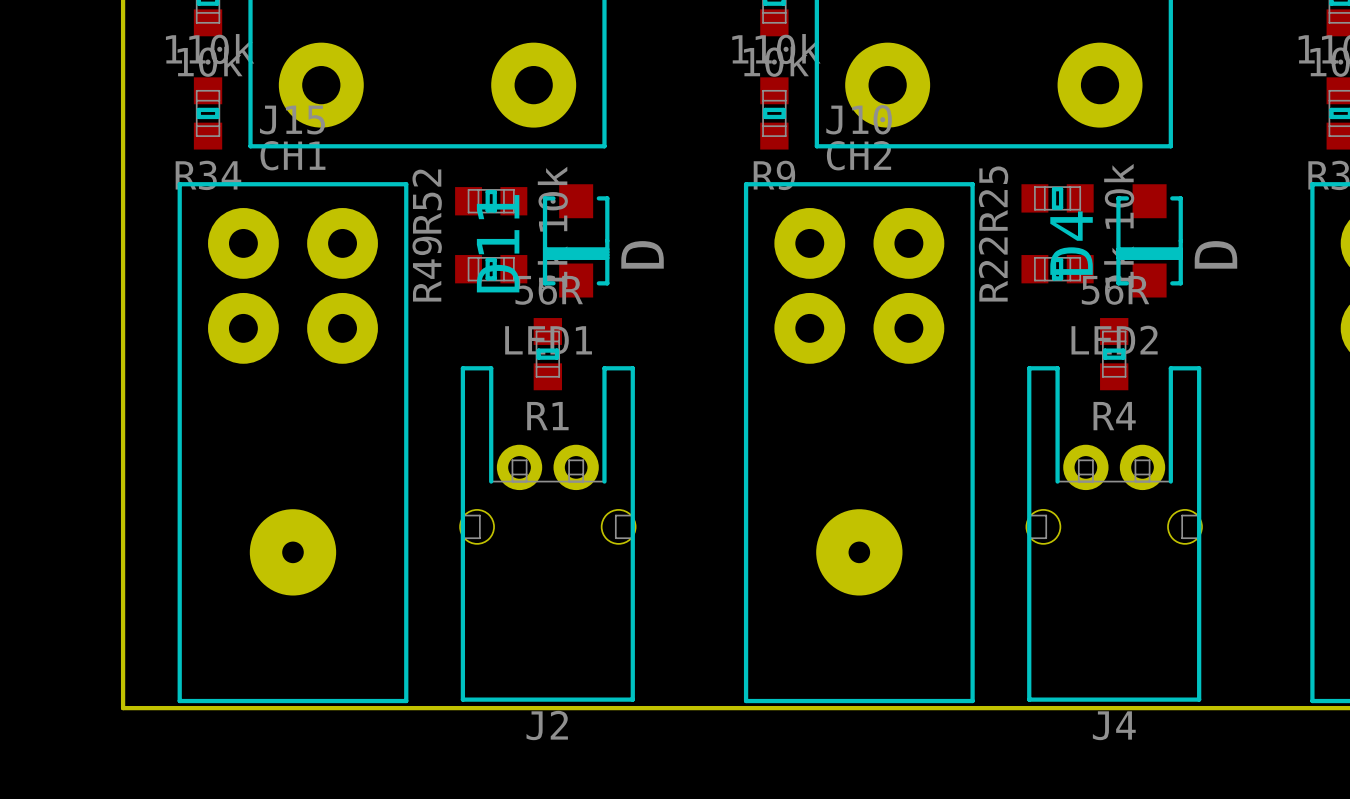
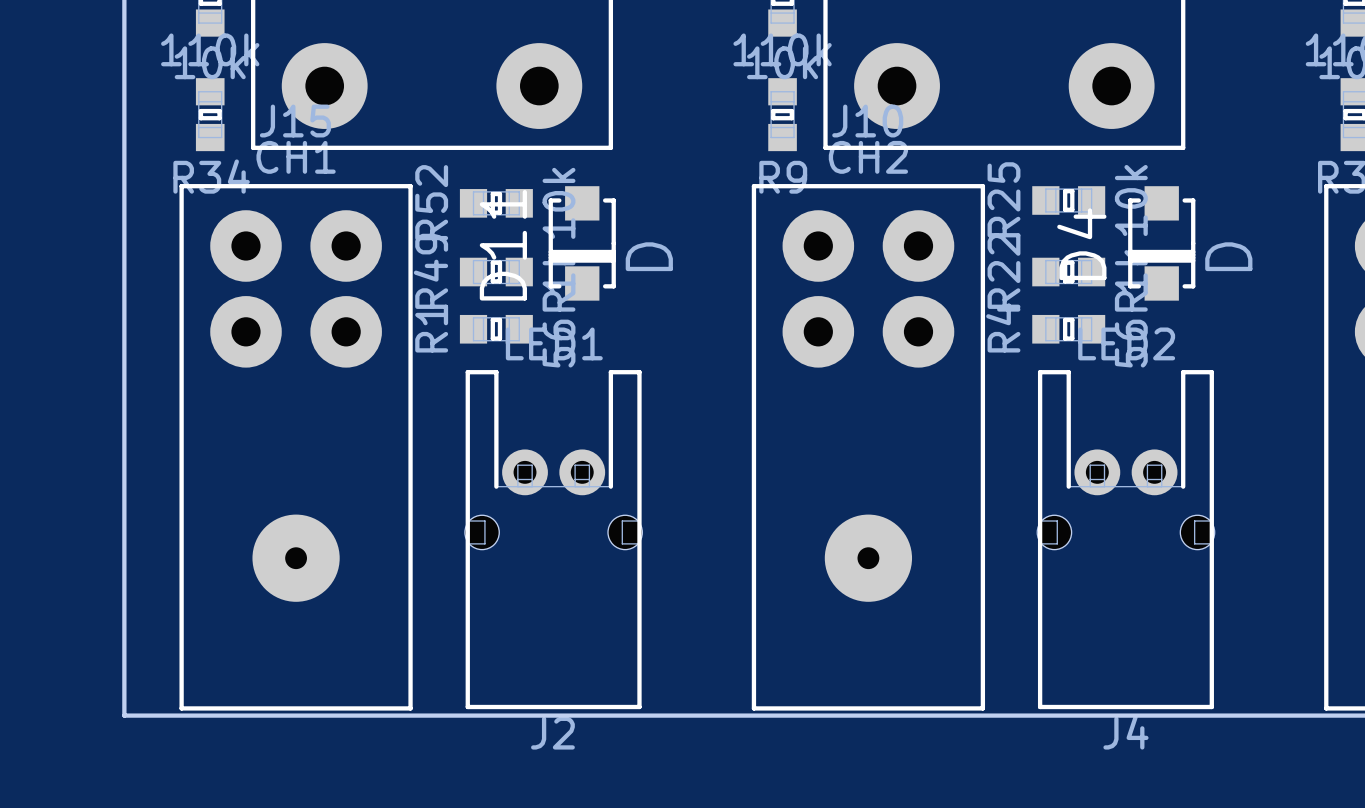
R1 rotation: 0° (547, 354) -> 90° clockwise (496, 329)
R1 position: (547, 354) -> (496, 329)
R4 rotation: 0° (1114, 354) -> 90° clockwise (1068, 329)
R4 position: (1114, 354) -> (1068, 329)

